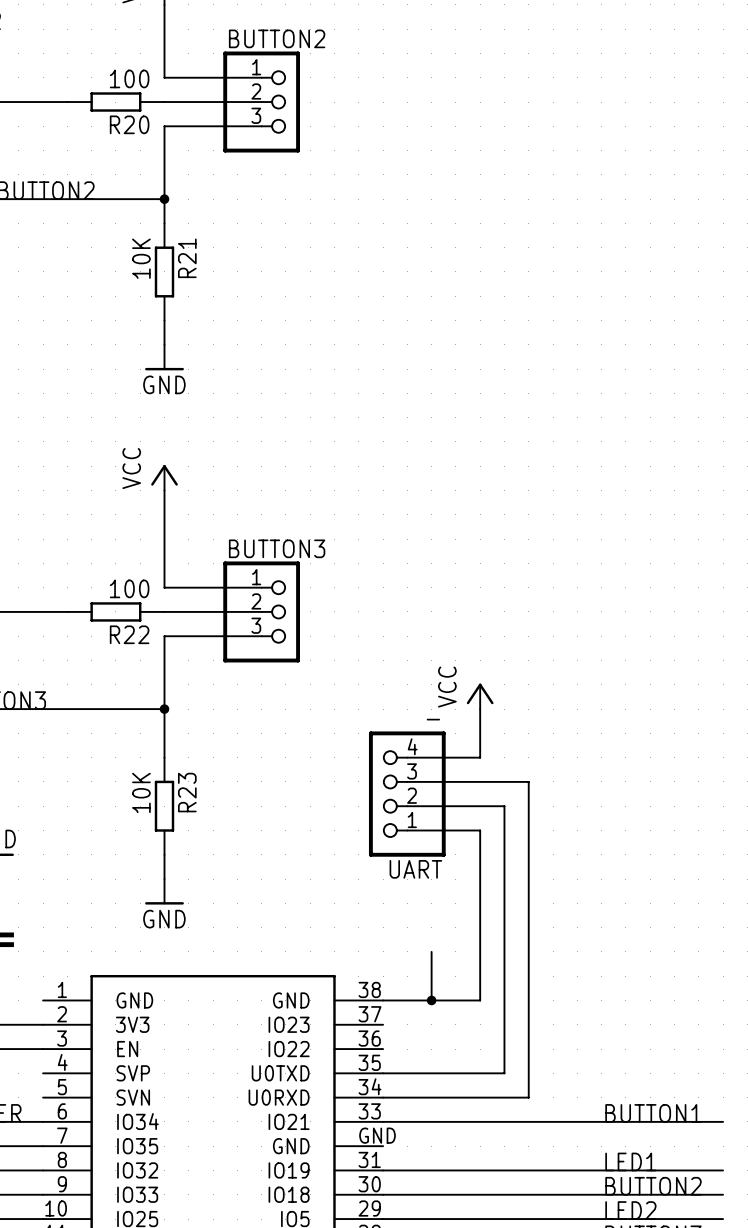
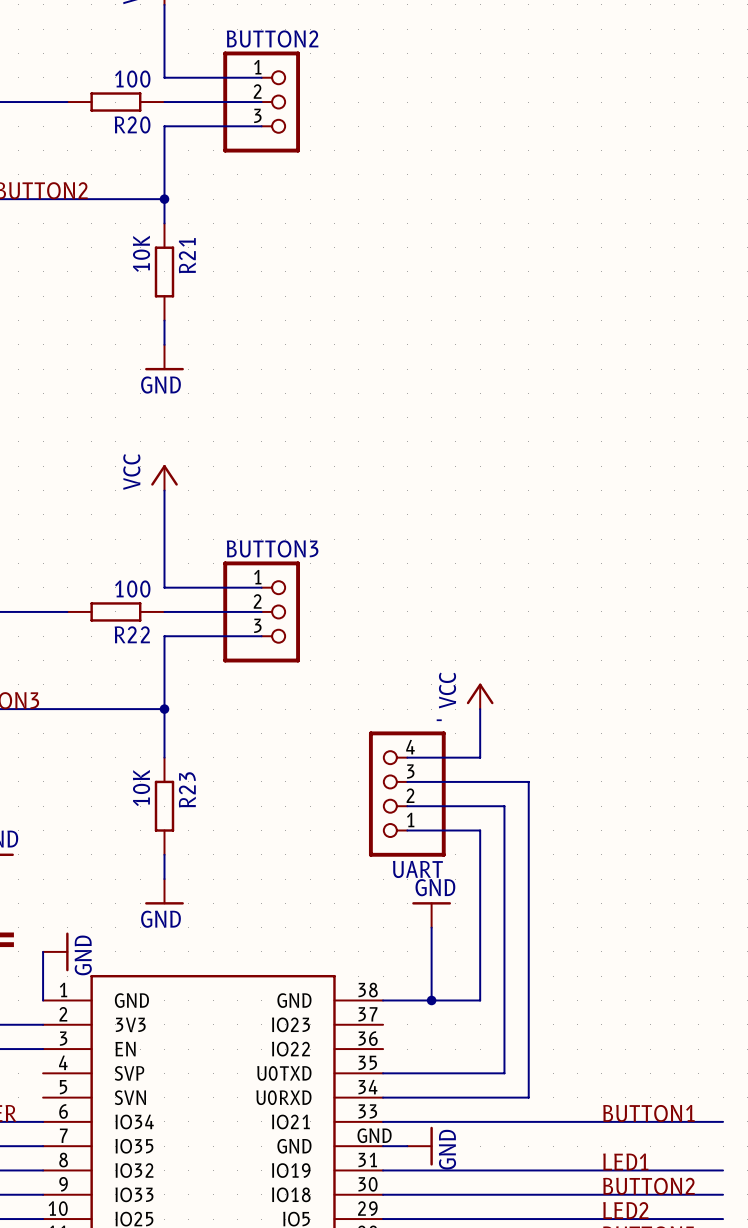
power symbol: none -> GND (431, 914)
wire: none -> (431, 927) (431, 951)
wire: none -> (43, 951) (43, 1000)
power symbol: none -> GND (55, 951)
wire: none -> (383, 1146) (407, 1146)
power symbol: none -> GND (420, 1146)

